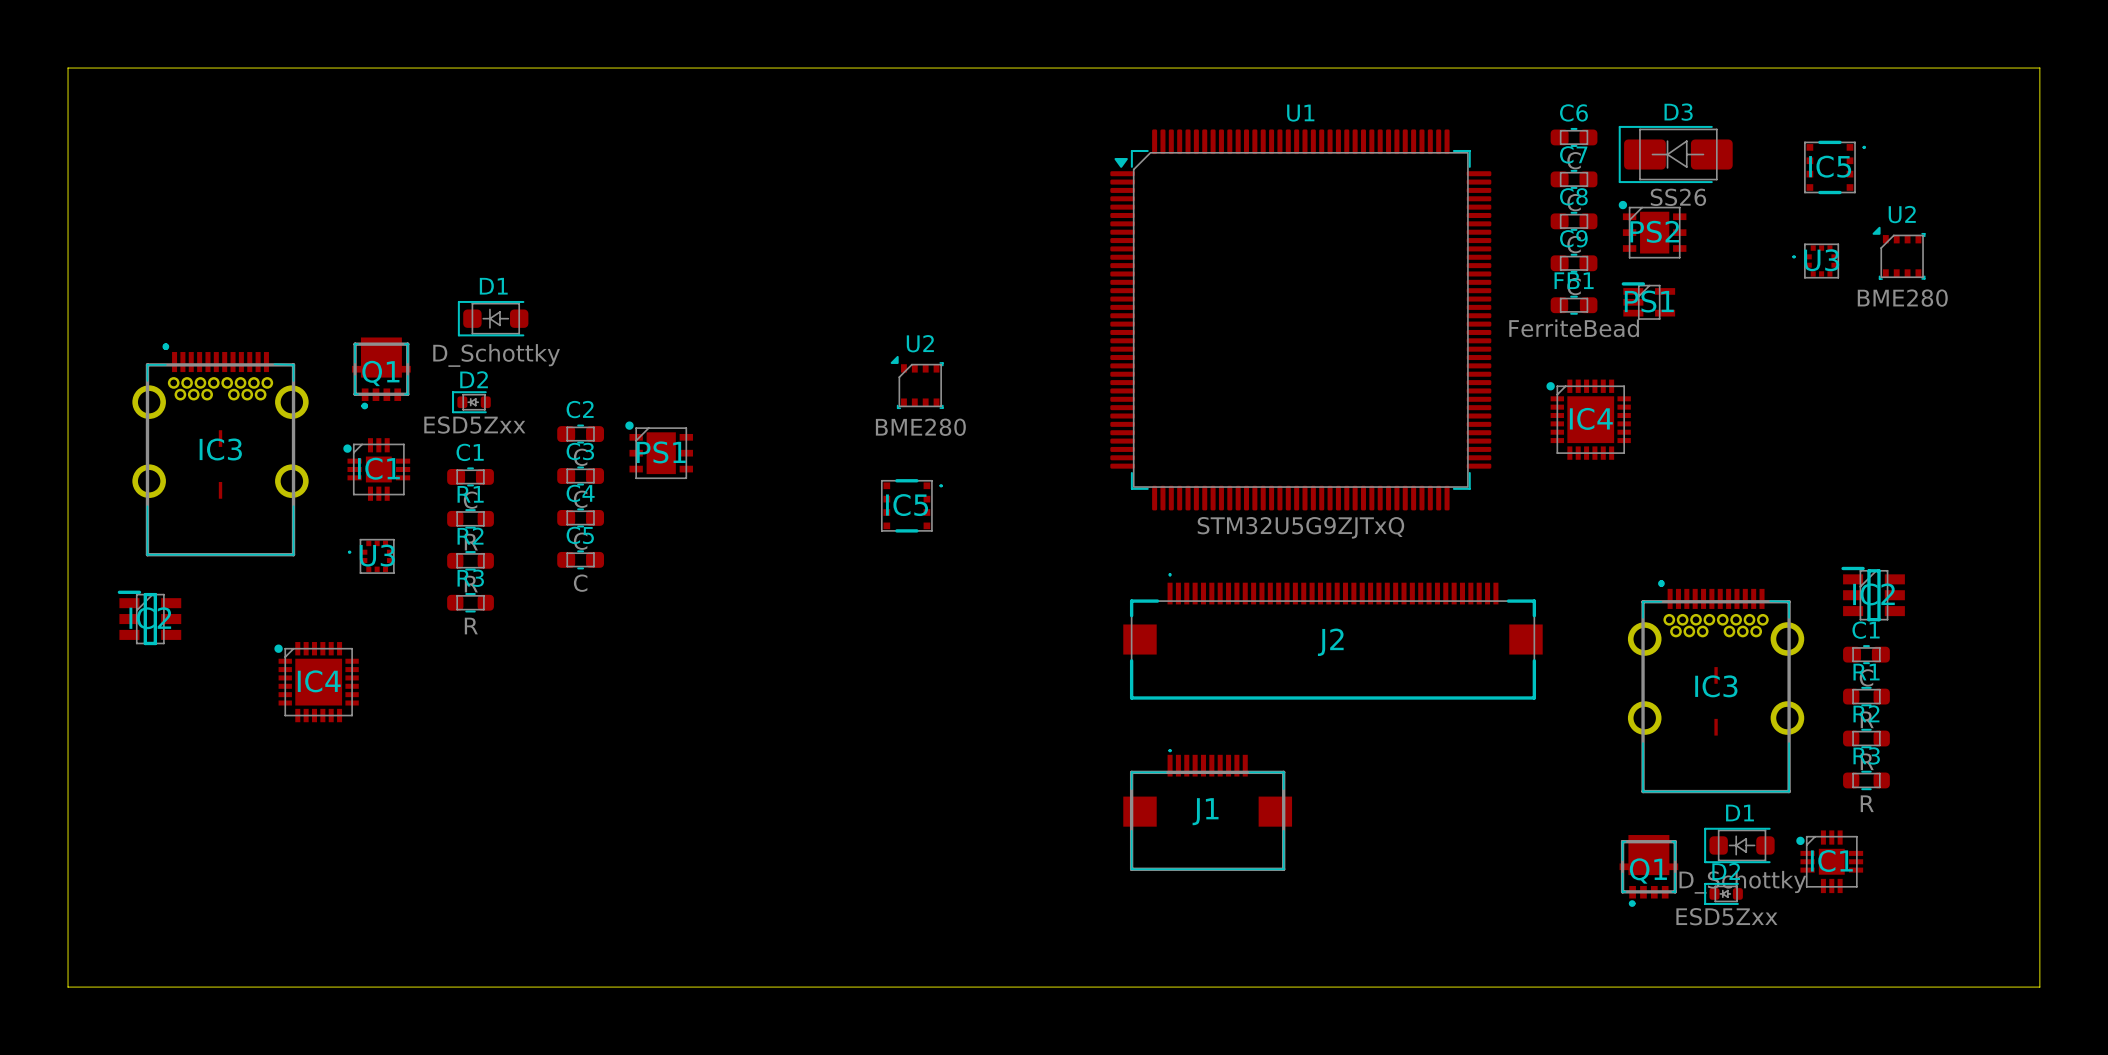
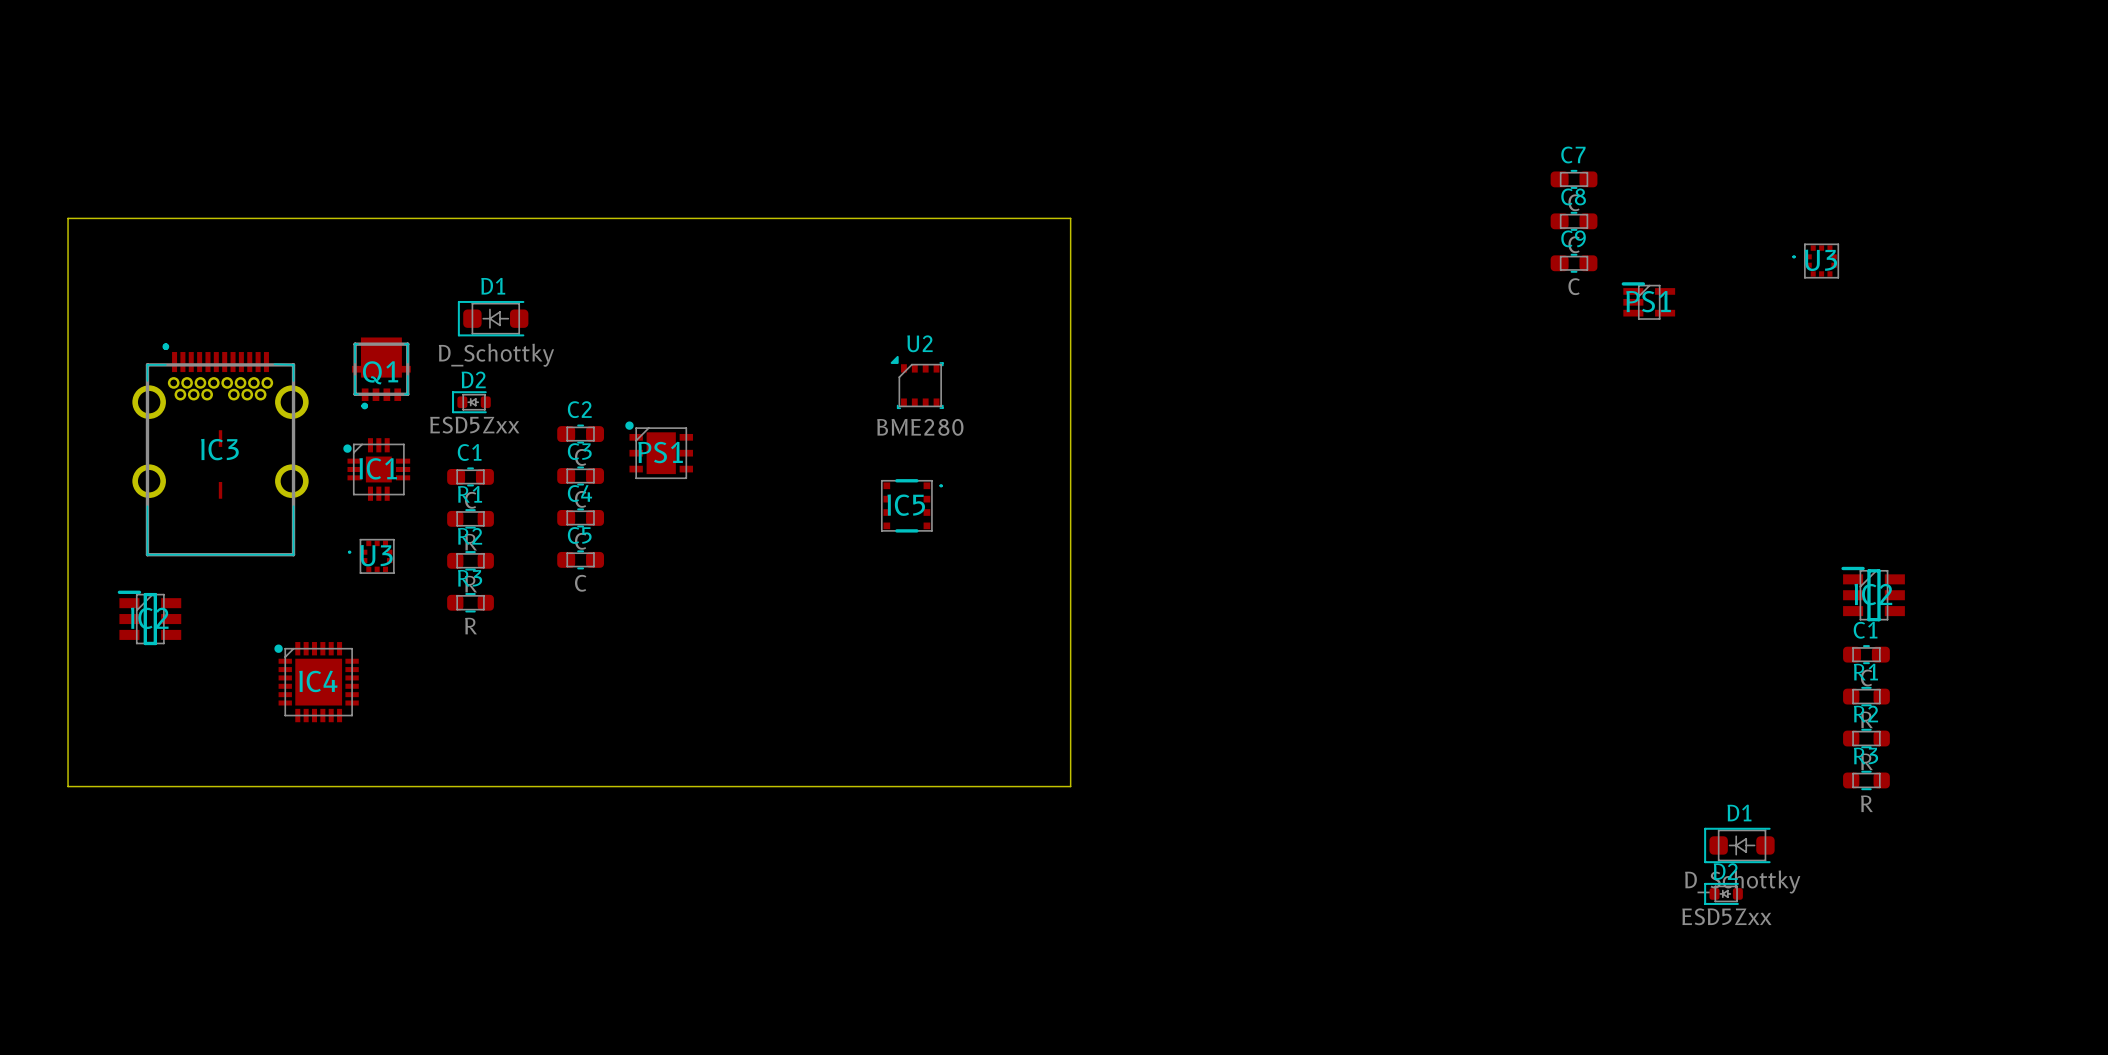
C6: C (1574, 137) -> none
D3: SS26 (1675, 154) -> none
IC5: (1834, 167) -> none
board edge: (68, 218) (68, 68) (2039, 68) (2039, 987) (68, 987) (68, 786) -> (68, 218) (1070, 218) (1070, 786) (68, 786)
PS2: (1652, 229) -> none
U2: BME280 (1899, 253) -> none
FB1: FerriteBead (1574, 305) -> none
U1: STM32U5G9ZJTxQ (1300, 319) -> none
IC4: (1588, 419) -> none
J2: (1332, 636) -> none
IC3: (1716, 686) -> none
J1: (1207, 809) -> none
IC1: (1829, 861) -> none
Q1: (1648, 870) -> none

